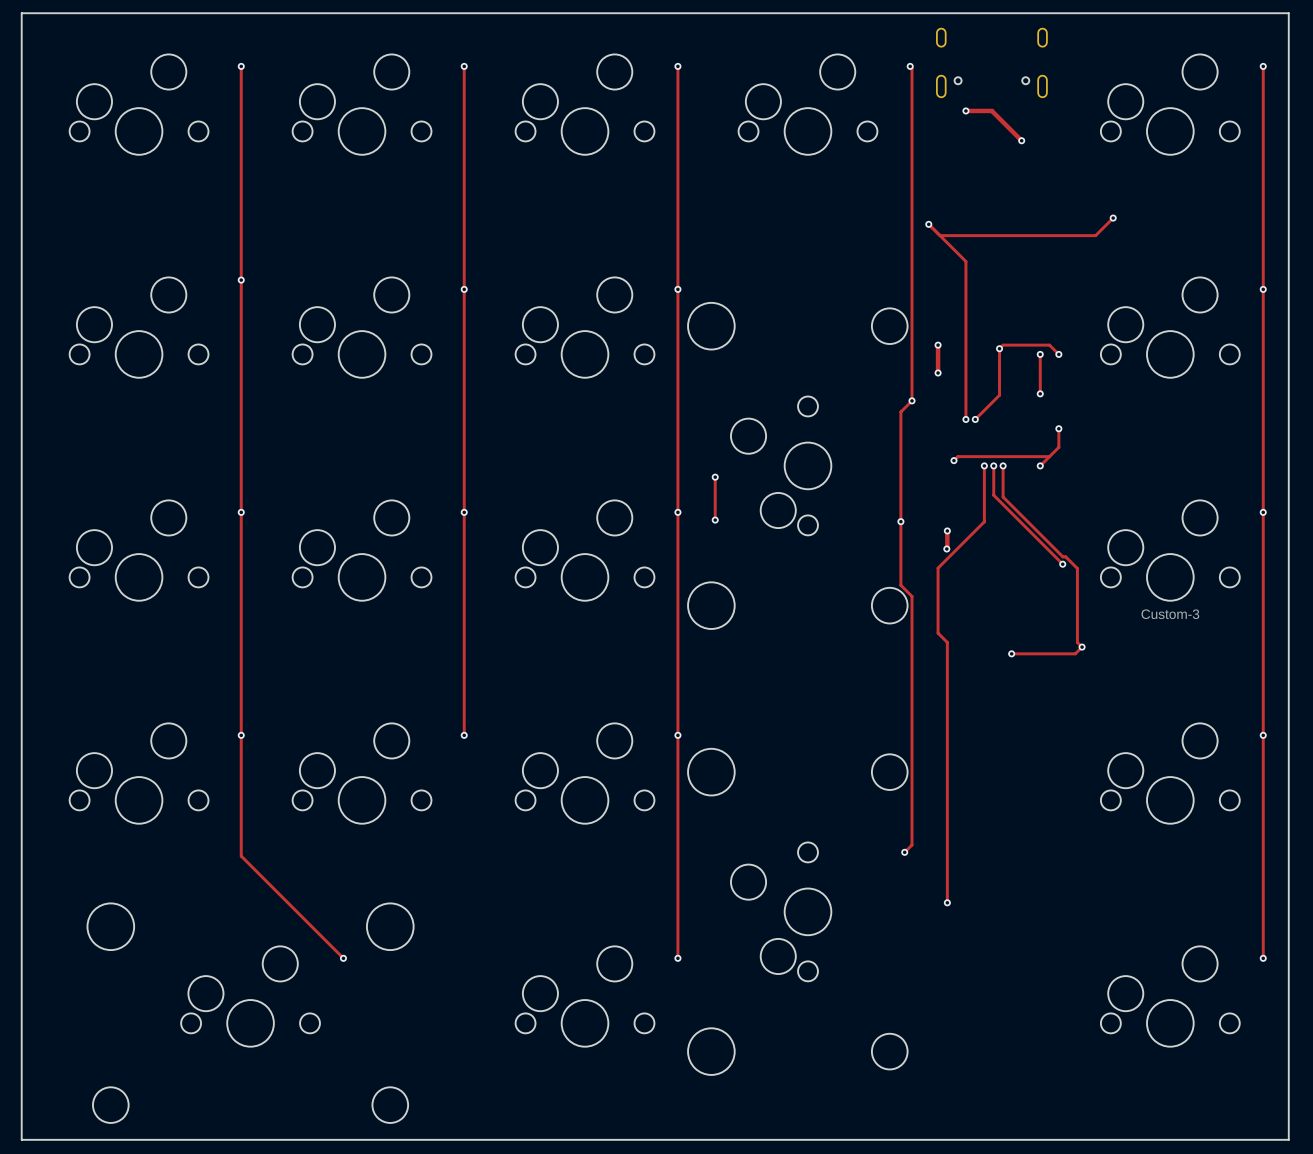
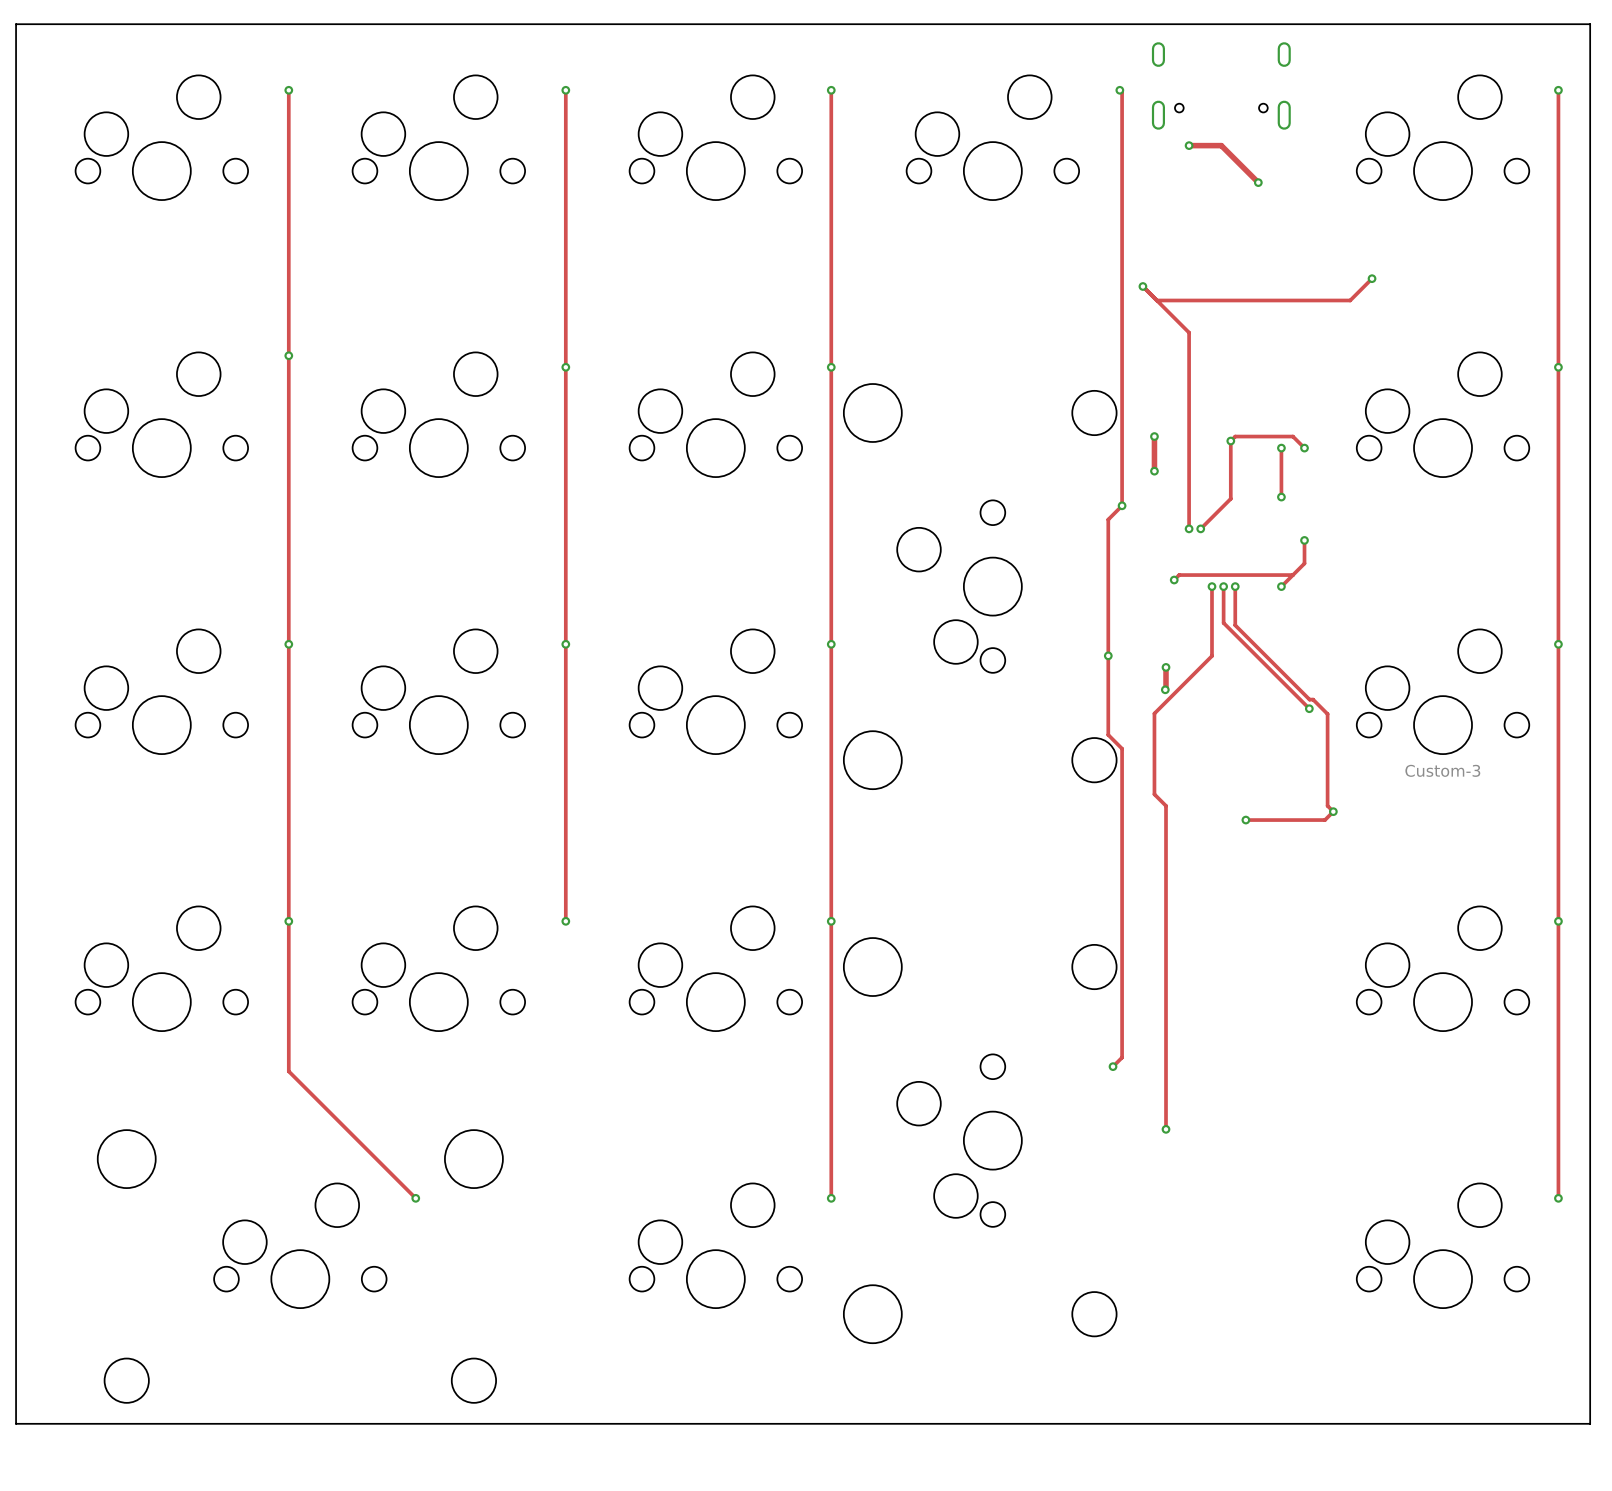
track: (715, 477) (715, 520) -> none
via: (715, 477) -> none
via: (715, 520) -> none

